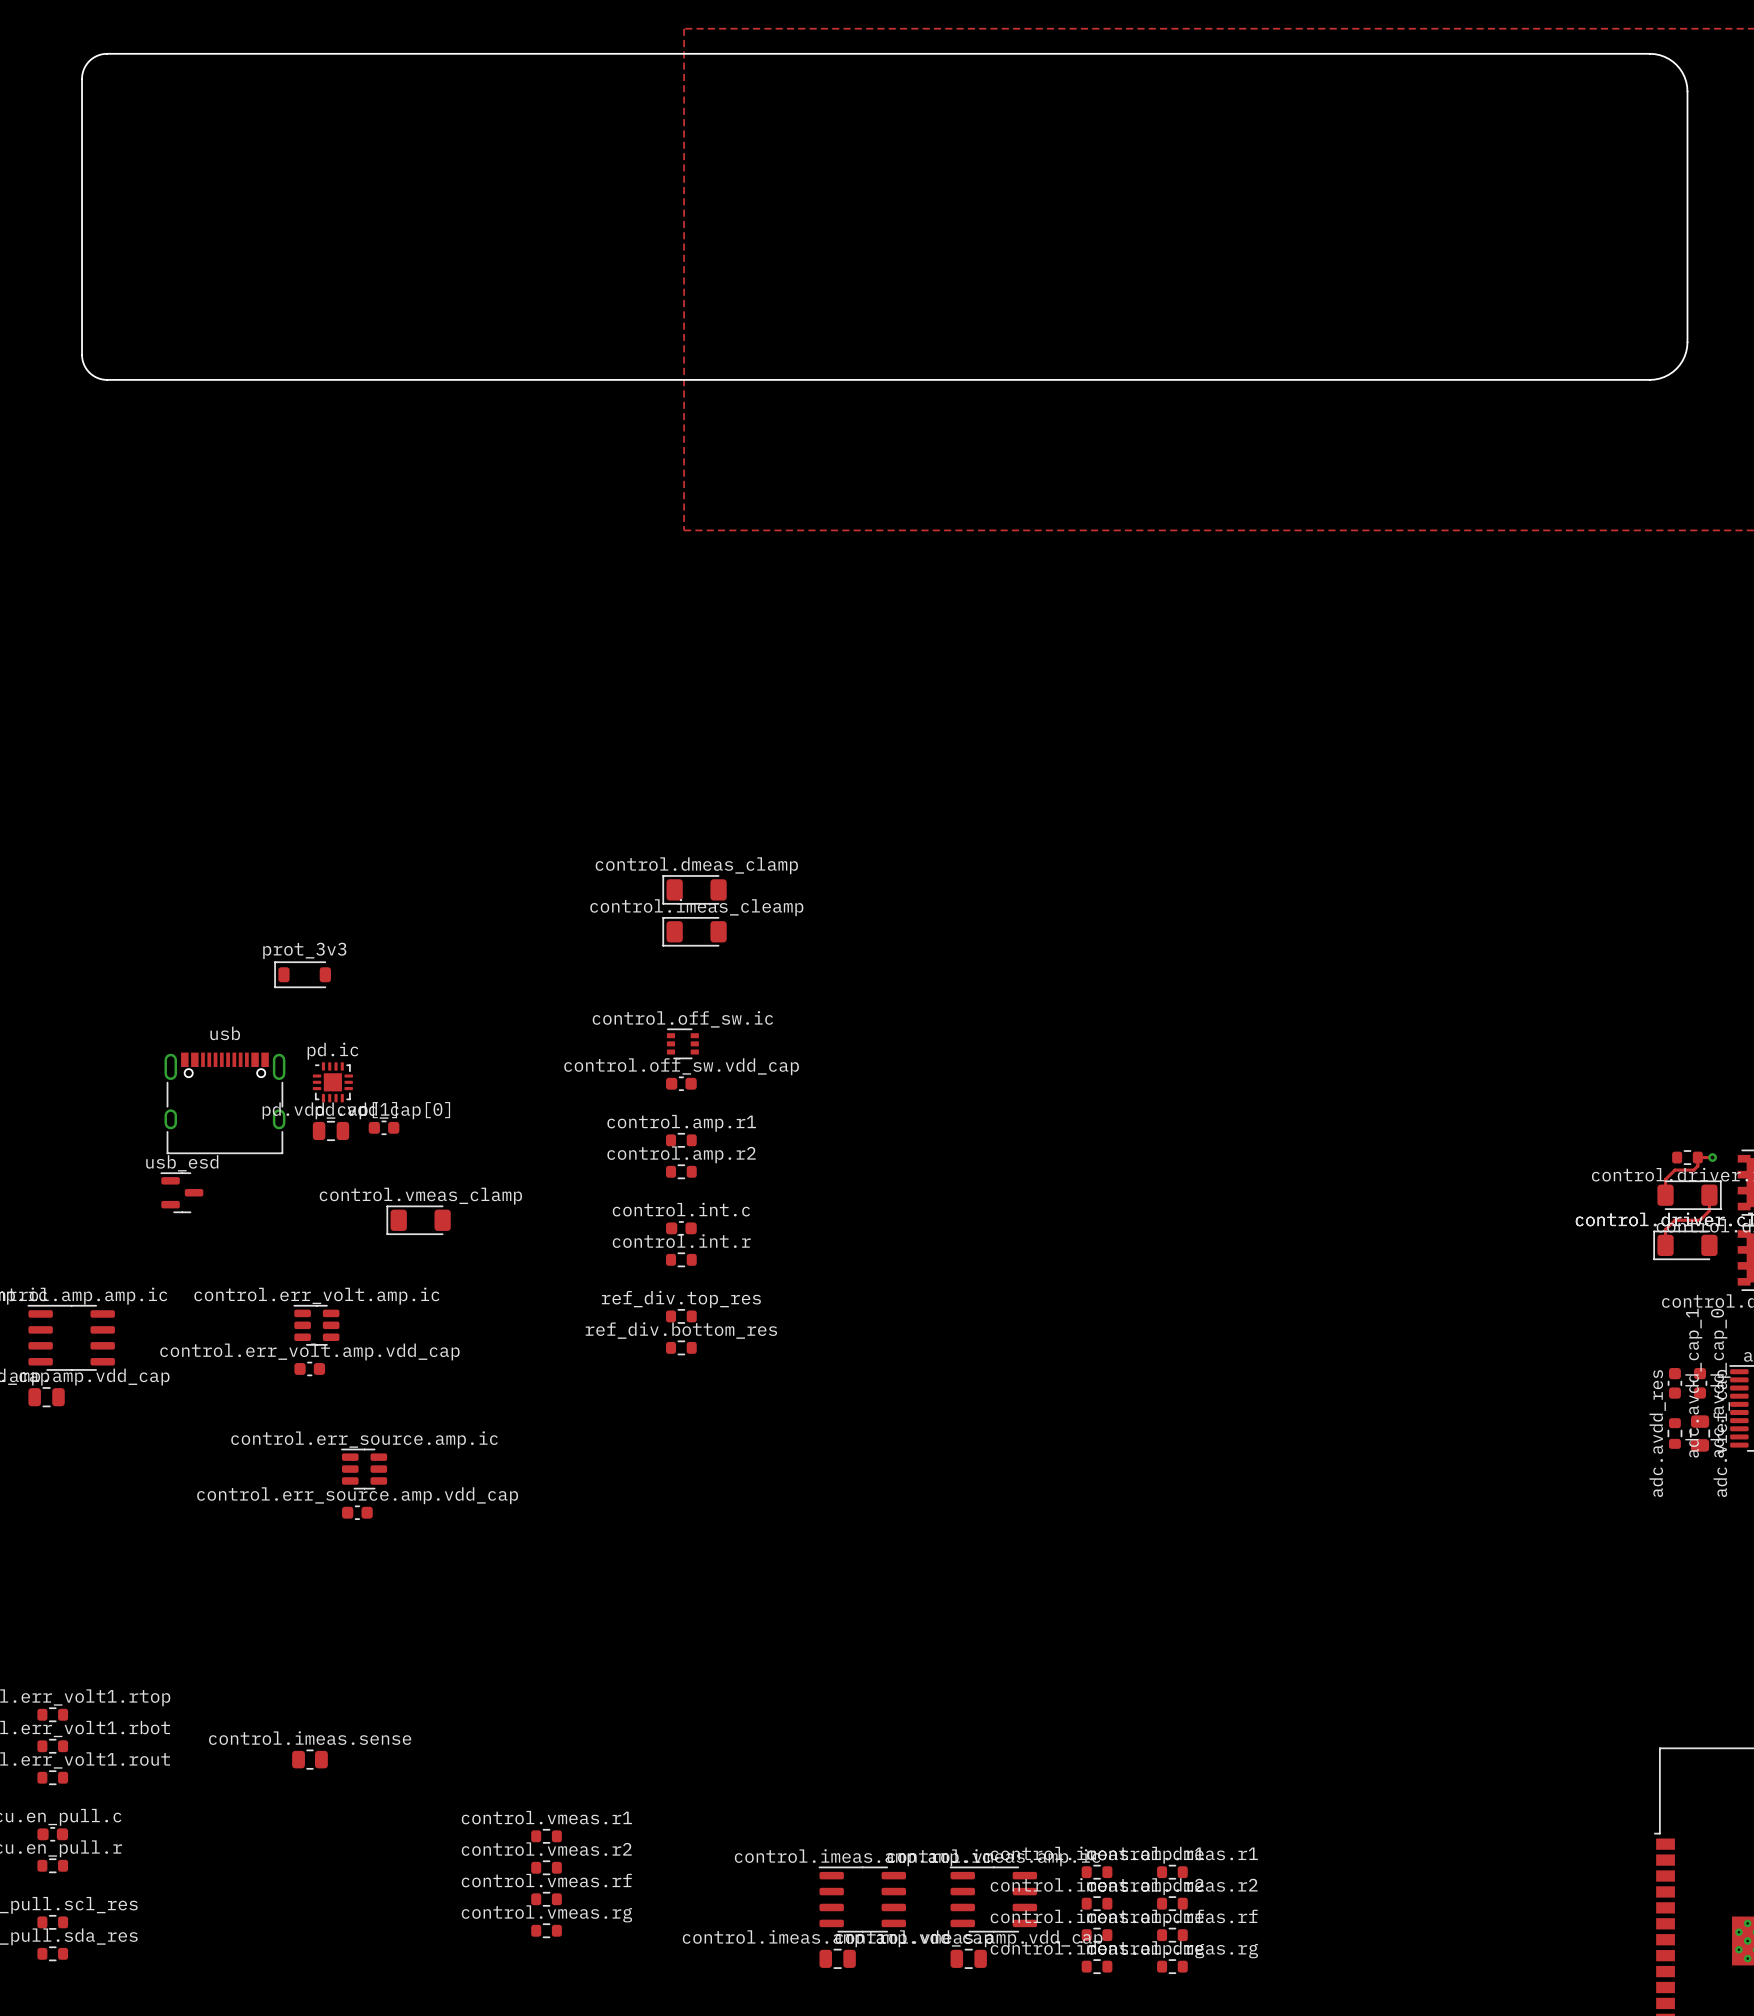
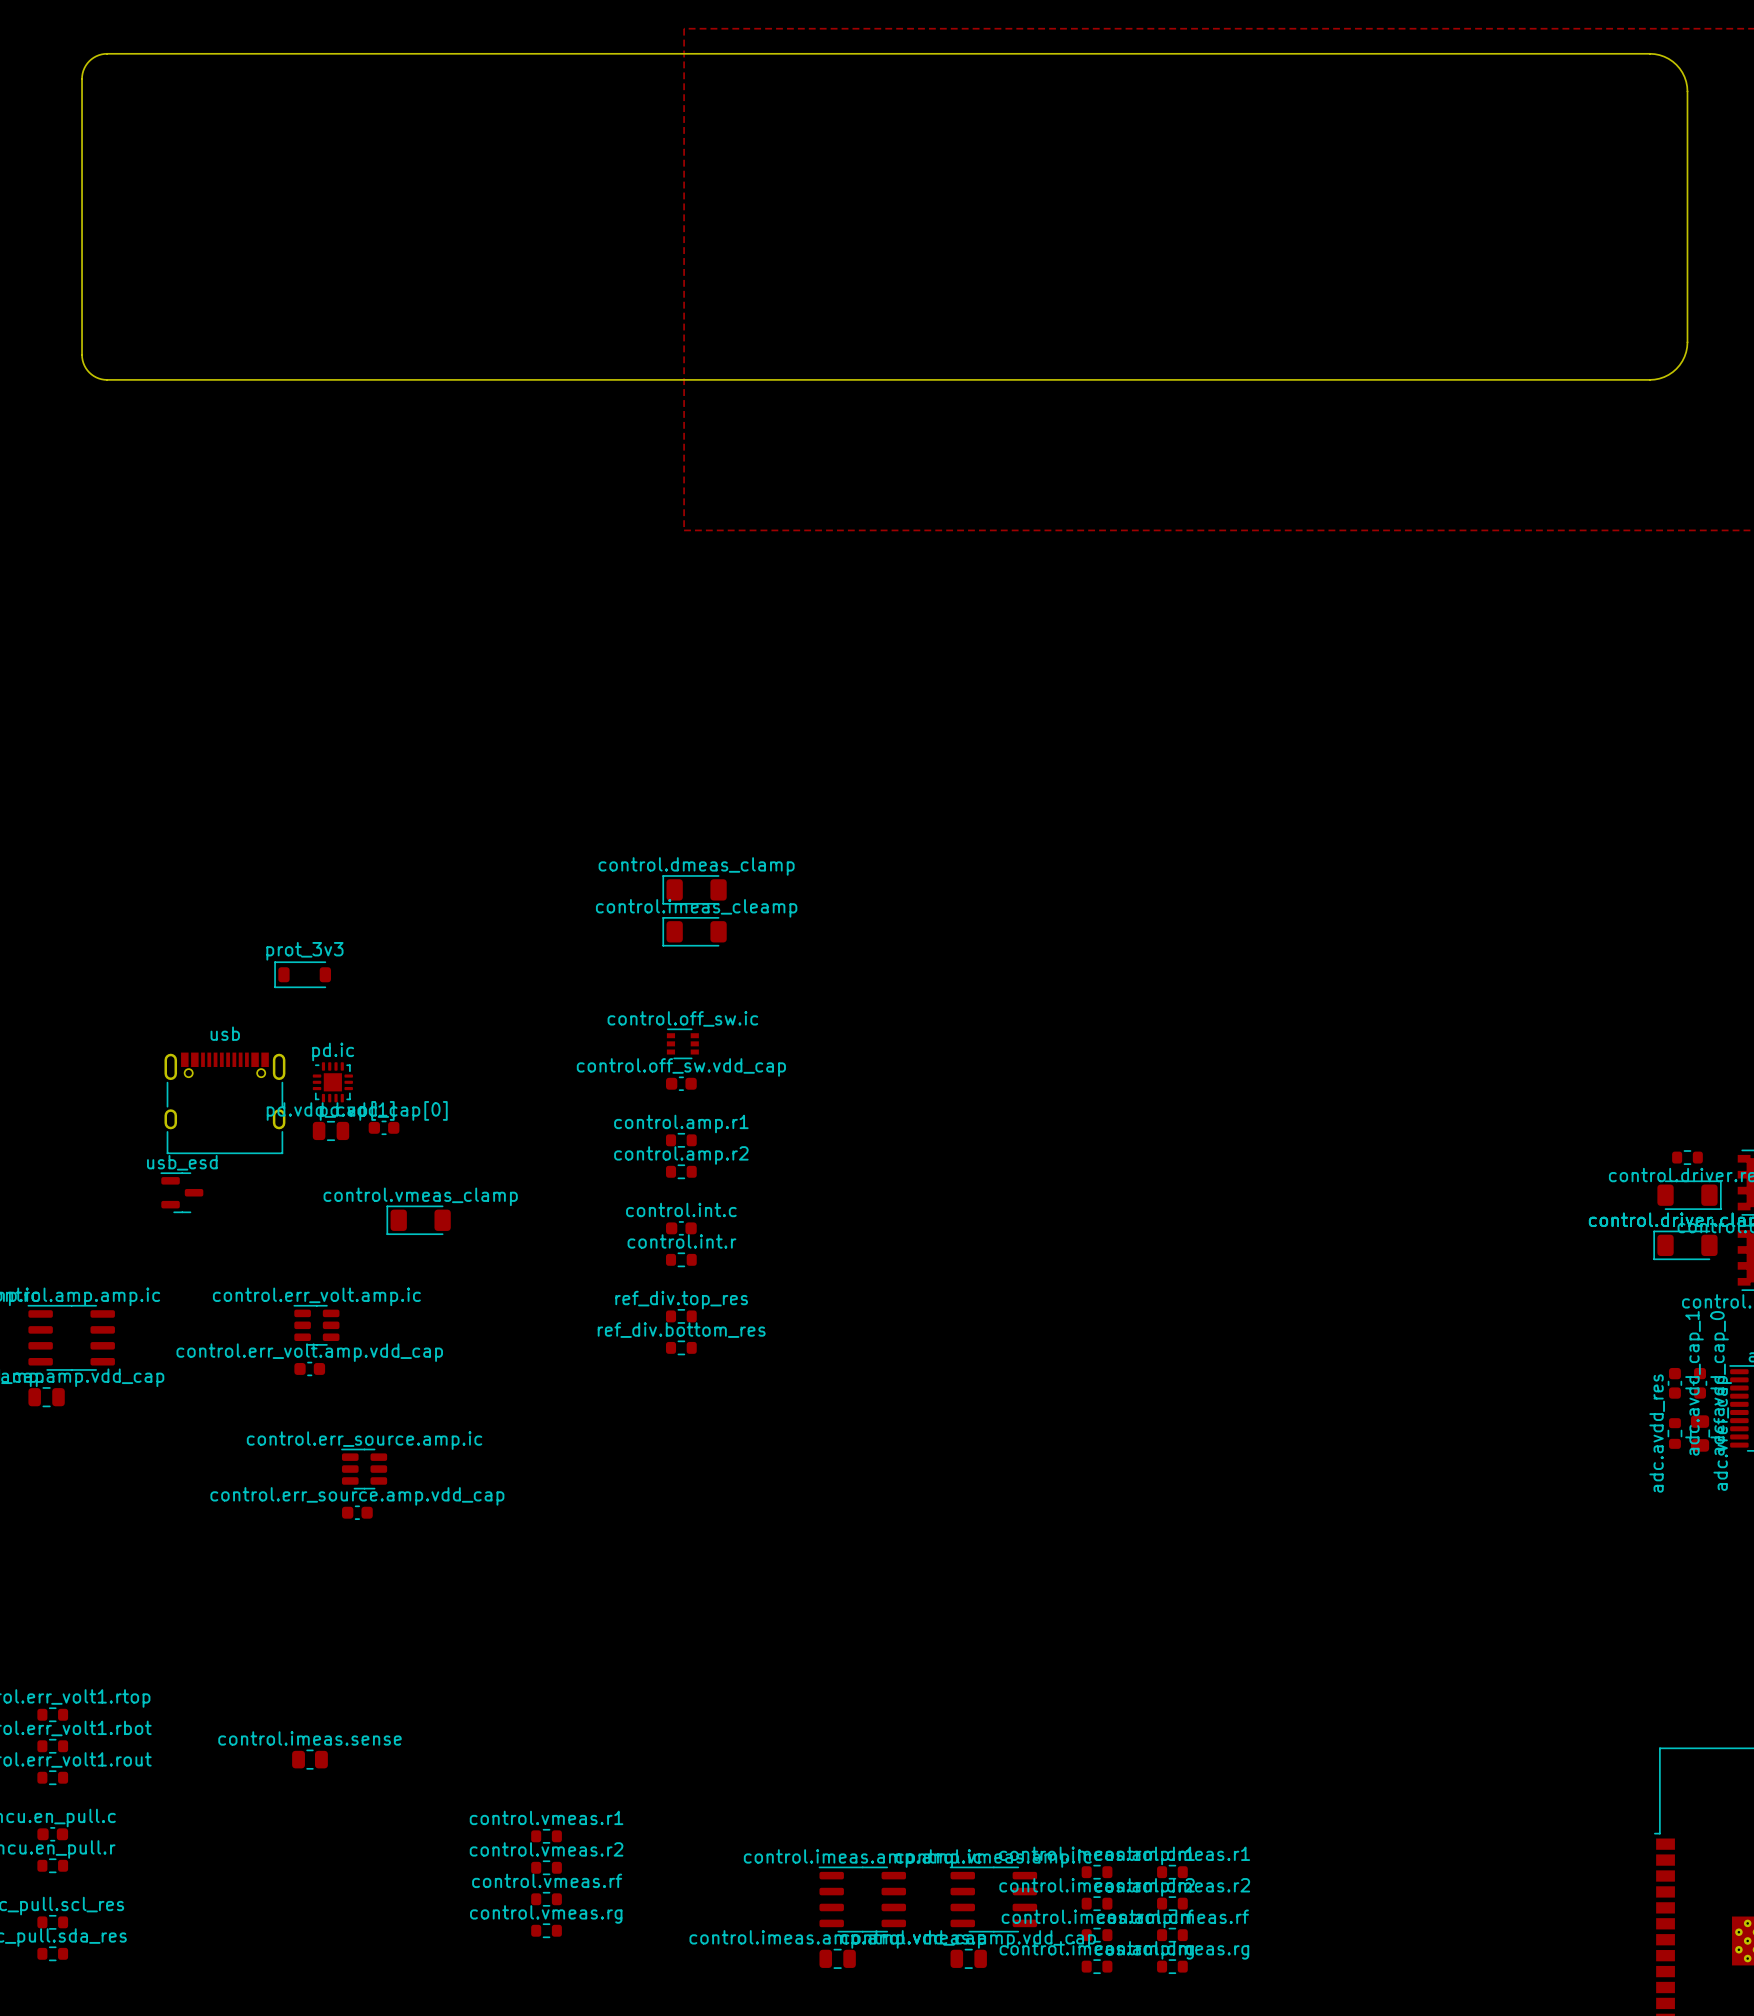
track: (1712, 1157) (1697, 1157) (1697, 1166) (1693, 1170) (1674, 1170) (1665, 1179) (1665, 1195) -> none
via: (1712, 1157) -> none
track: (1709, 1195) (1709, 1210) (1700, 1220) (1674, 1220) (1665, 1229) (1665, 1245) -> none

